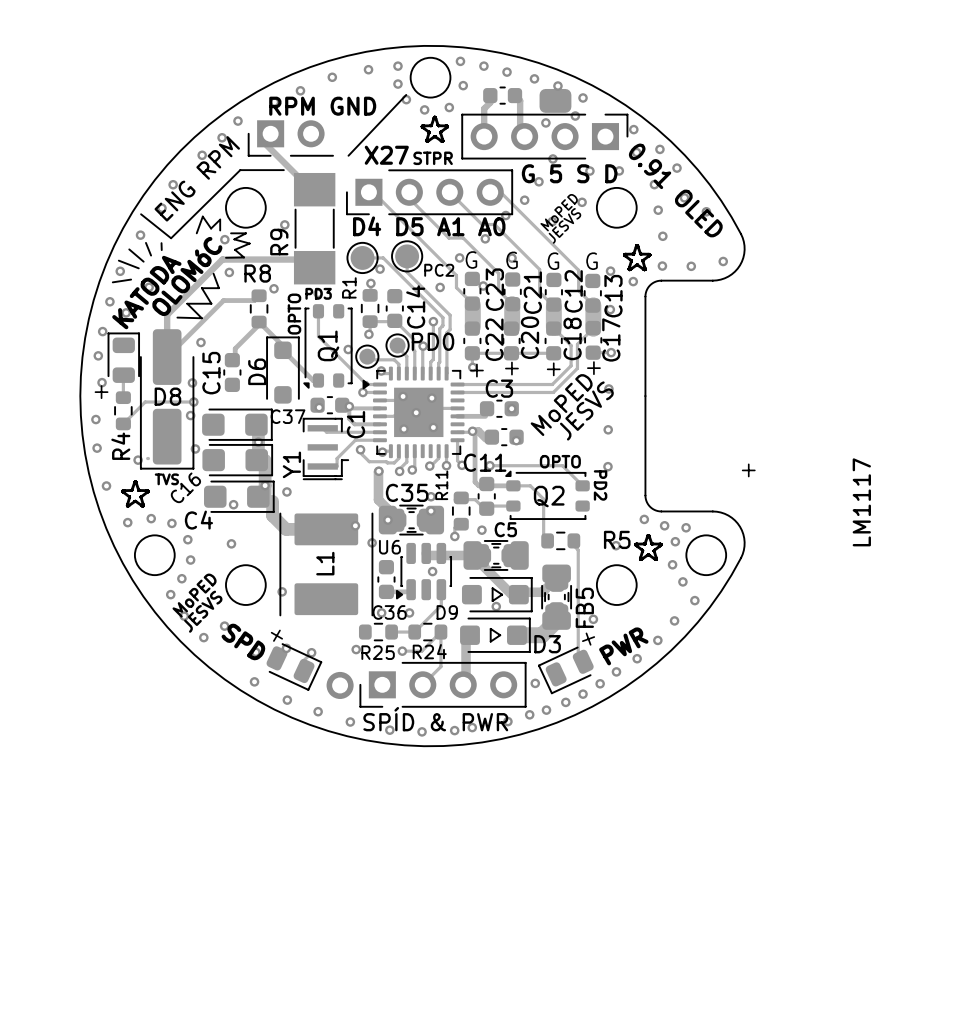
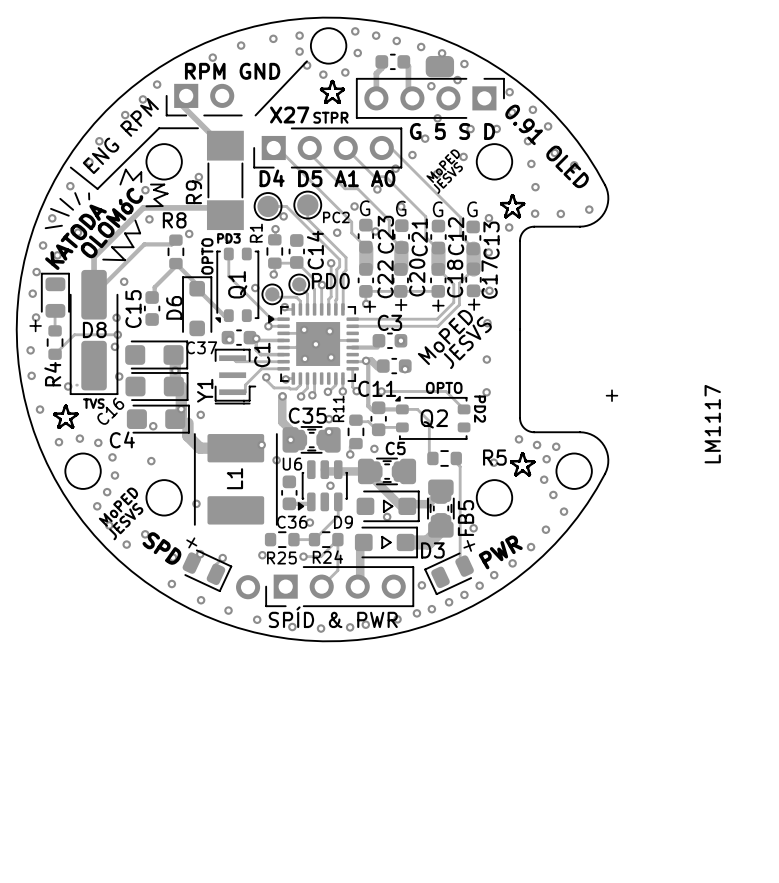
via: (381, 612) -> none

